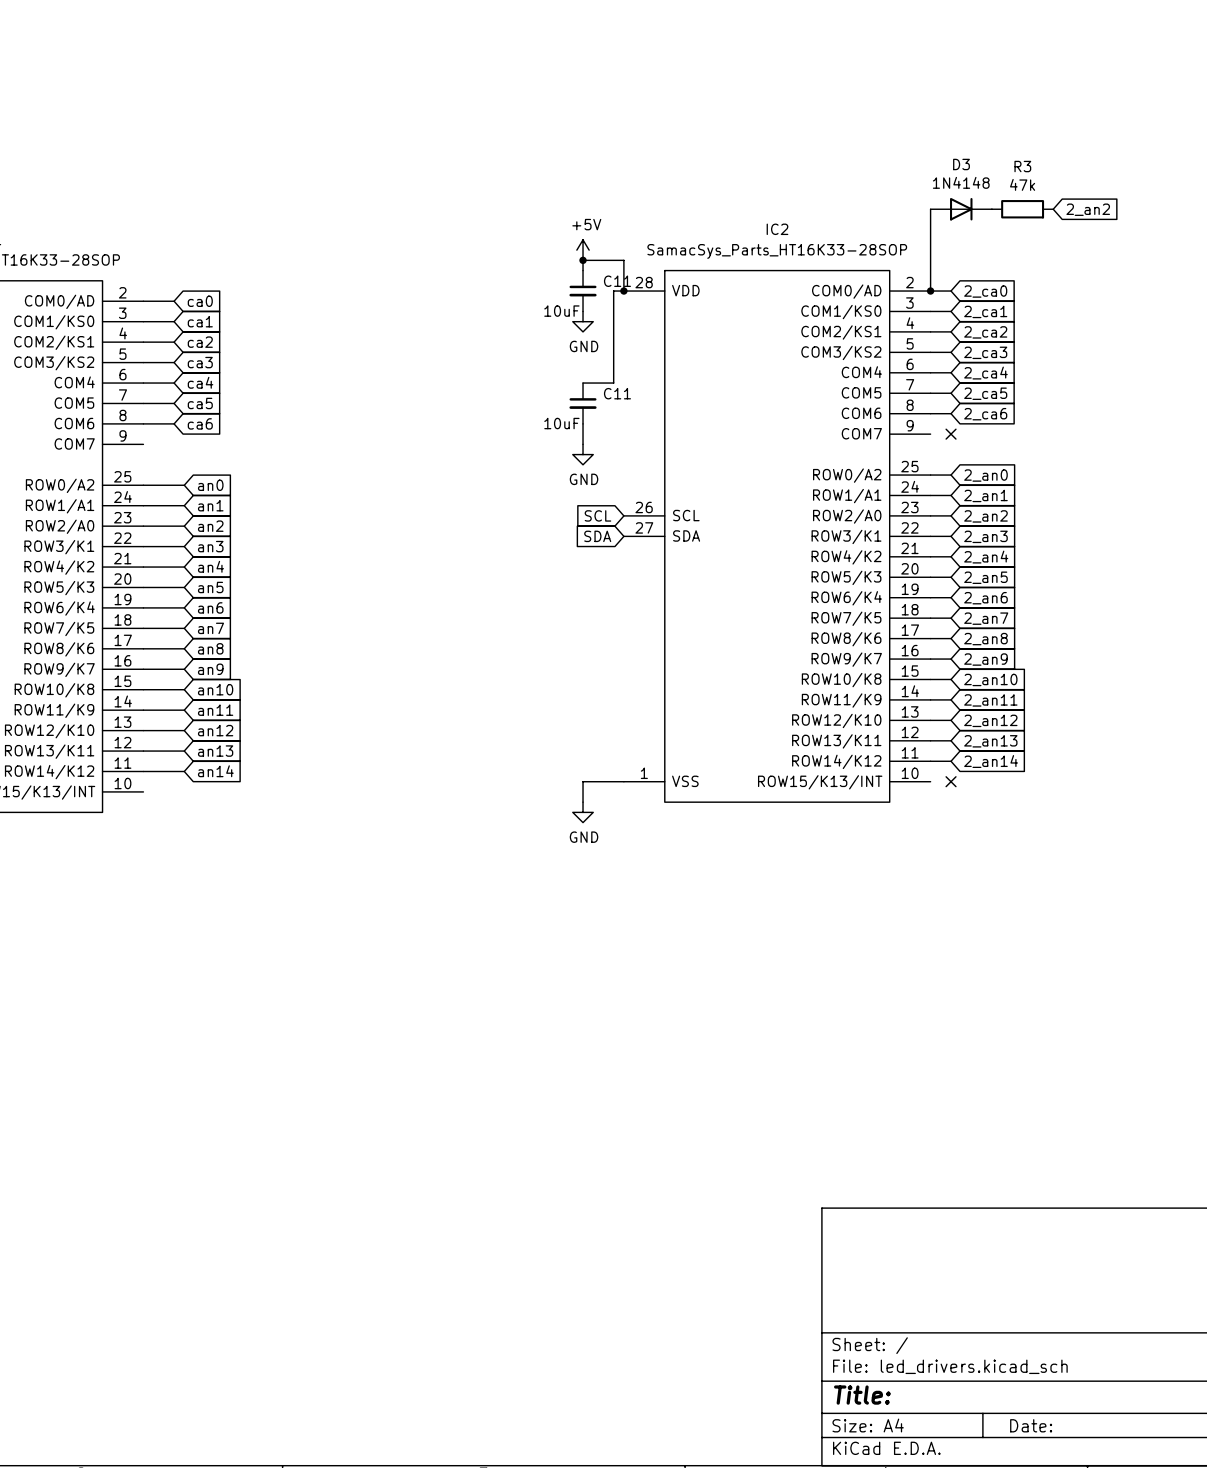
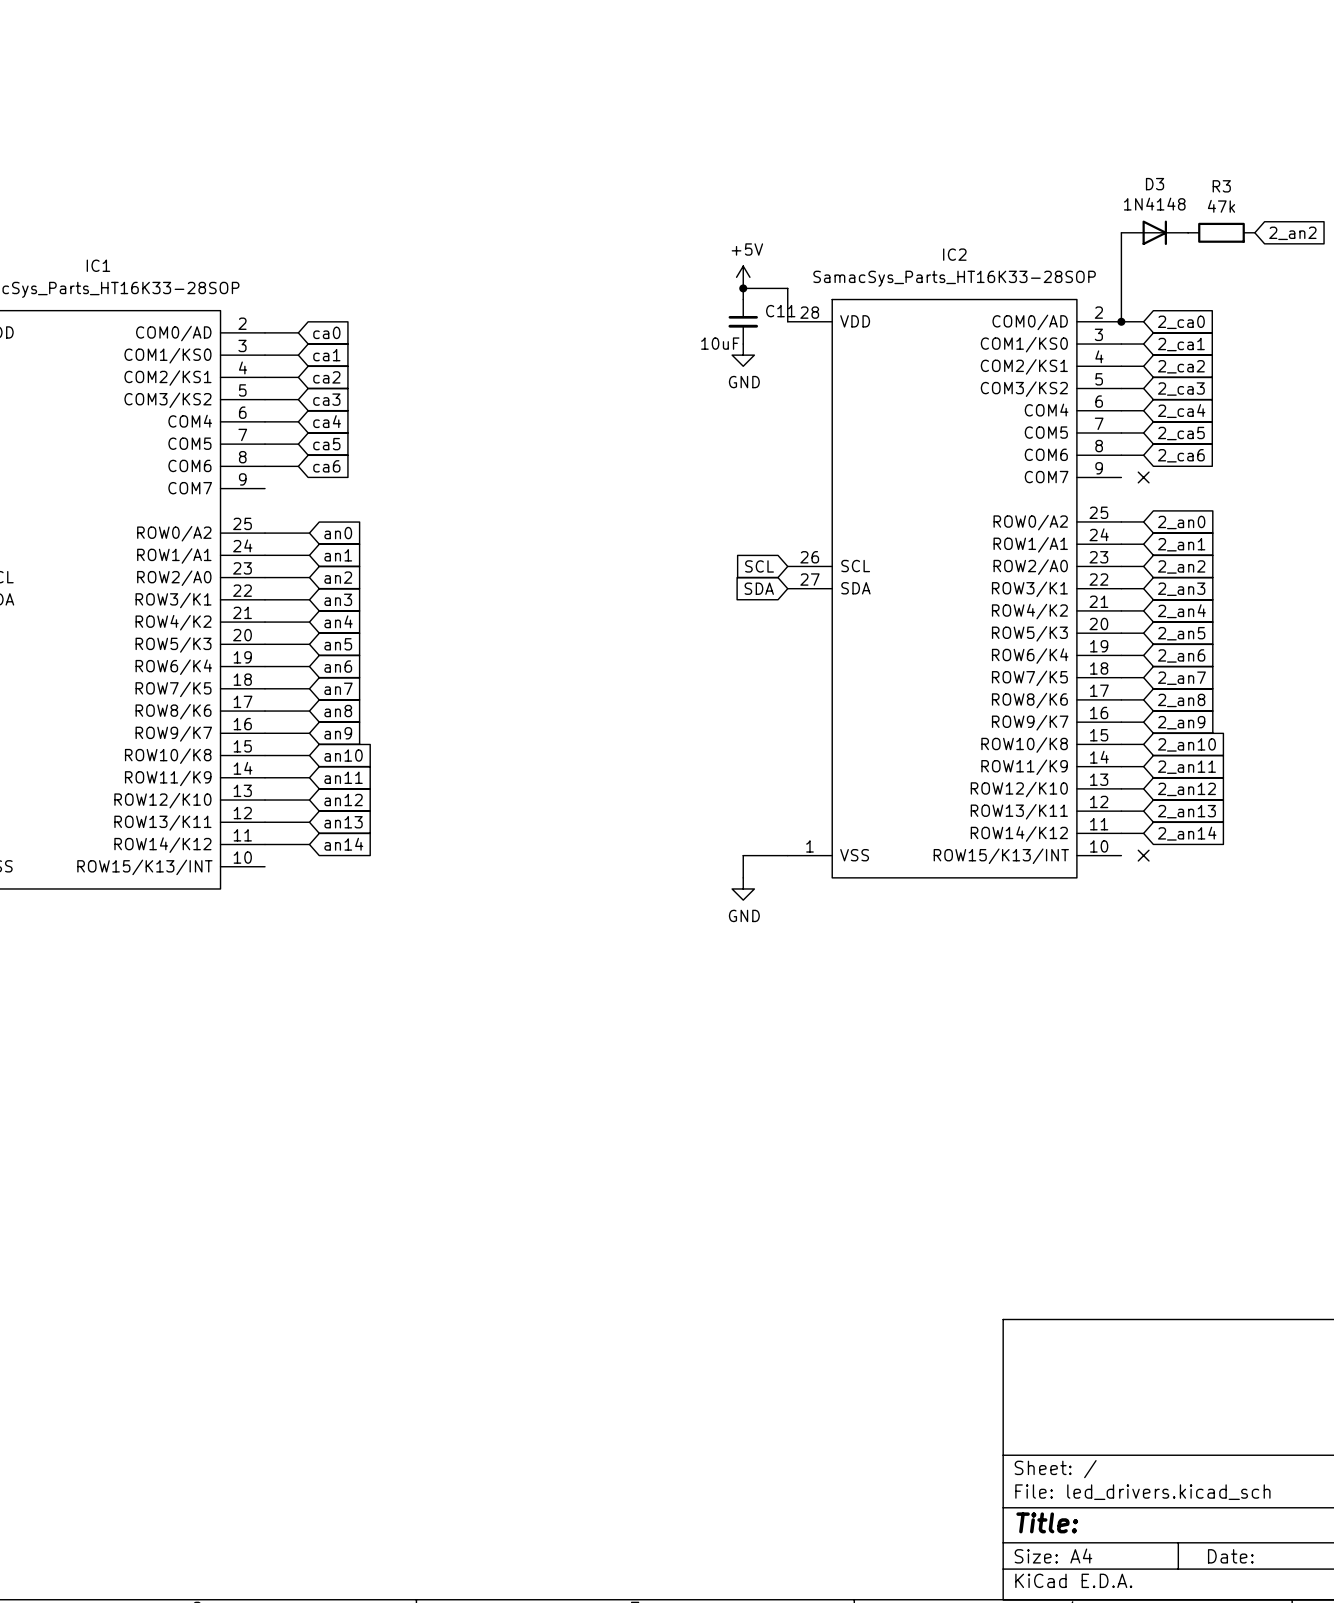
wire: (623, 291) (613, 291) (613, 383) (583, 383) -> none
junction: (623, 291) -> none
C11: 10uF (583, 403) -> none
wire: (583, 423) (583, 444) -> none
power symbol: GND (583, 454) -> none

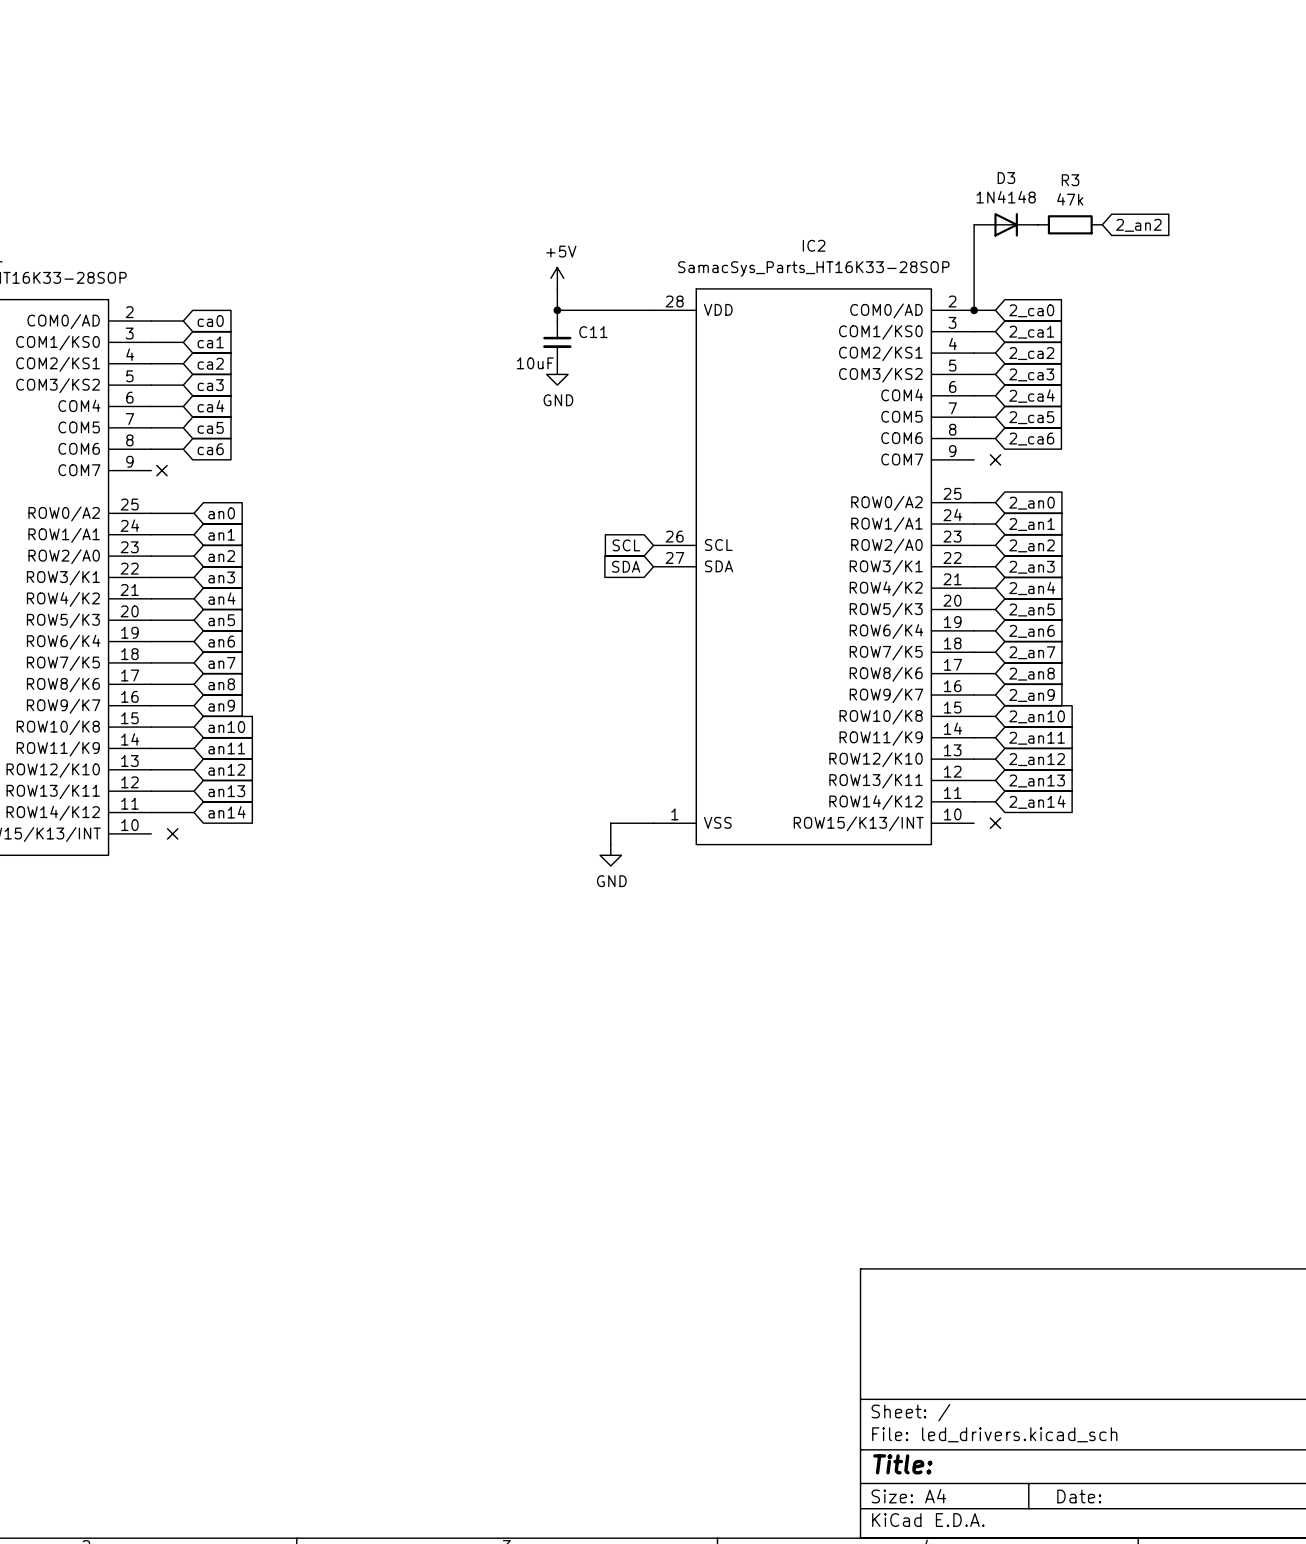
power symbol position: +5V (743, 277) -> +5V (557, 278)
junction: (743, 288) -> none
wire: none -> (557, 288) (557, 320)
wire: (743, 299) (743, 288) (787, 288) (787, 321) -> (557, 310) (653, 310)
junction: none -> (557, 310)
C11 position: (743, 321) -> (557, 342)
power symbol position: GND (743, 355) -> GND (557, 374)
no-connect mark: none -> (161, 470)
no-connect mark: none -> (172, 833)

